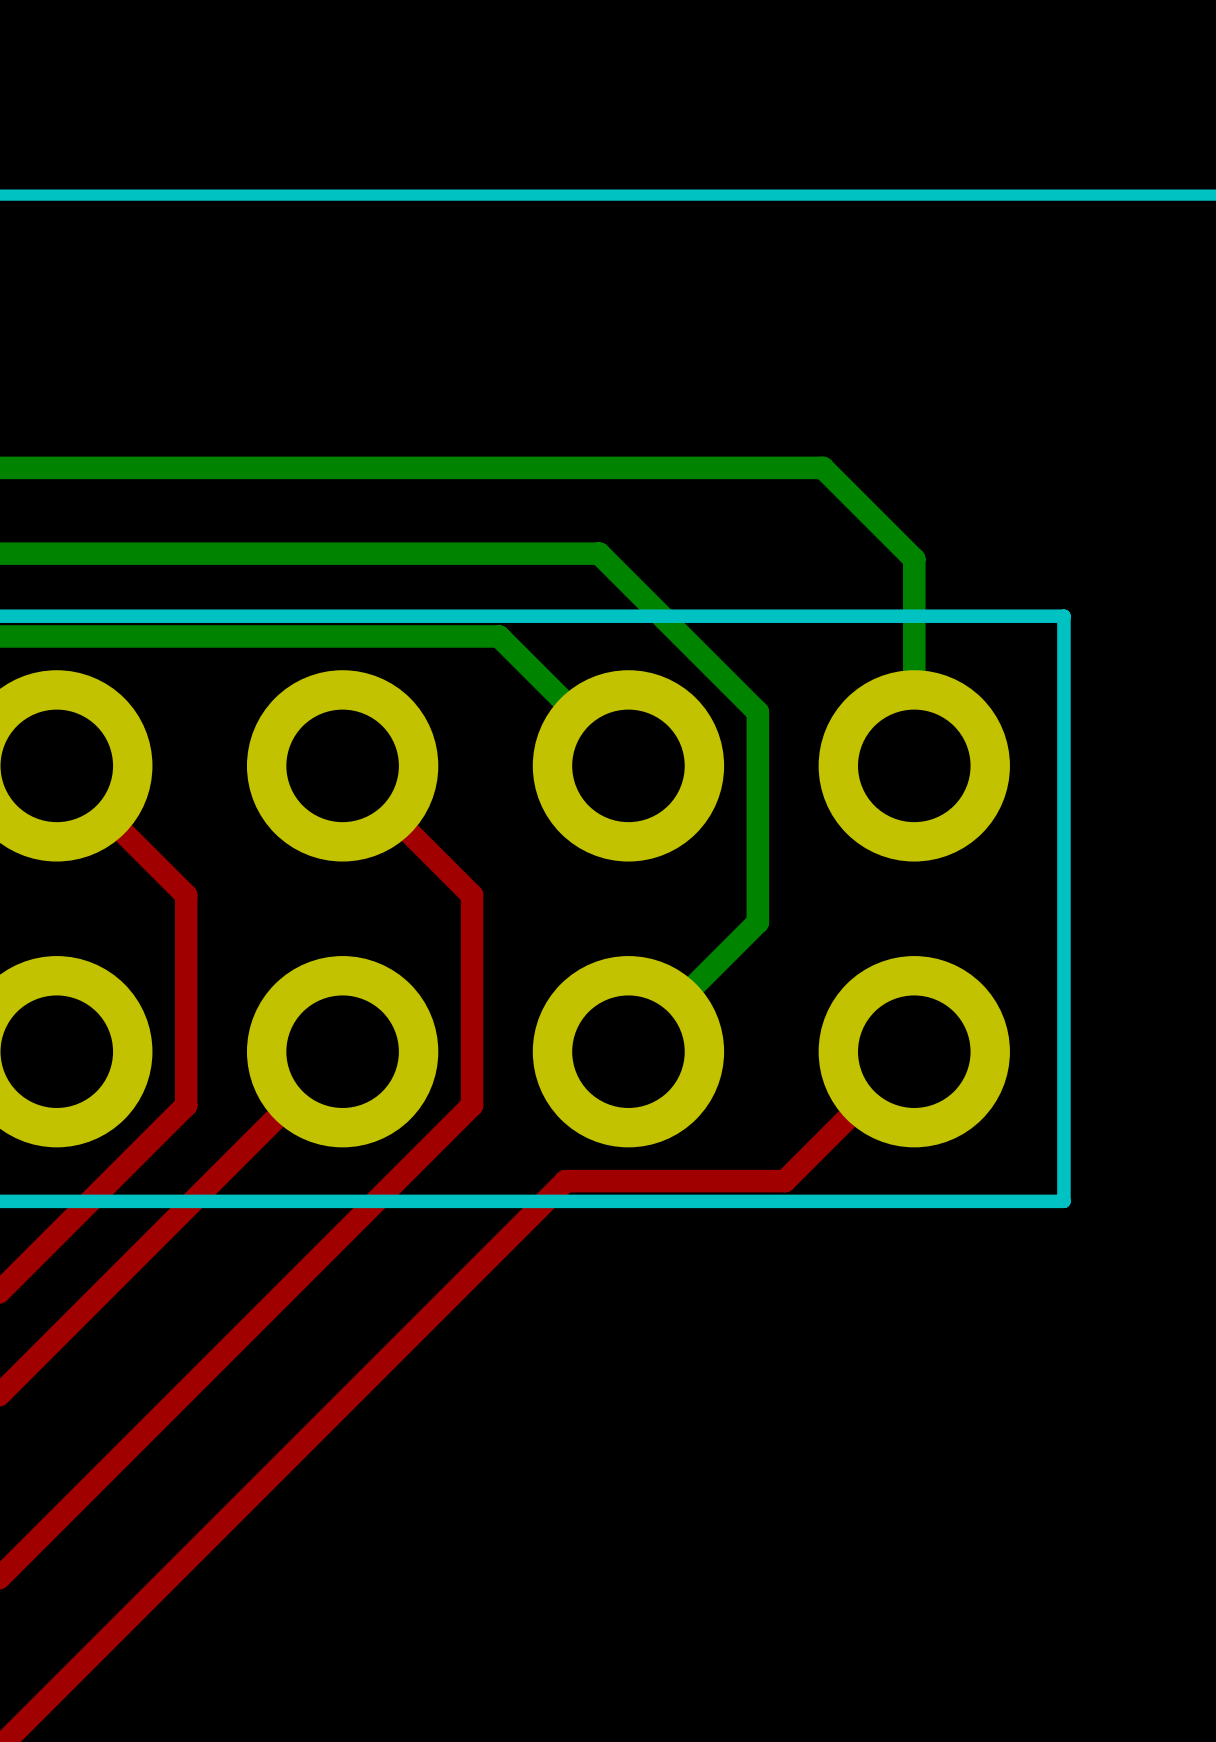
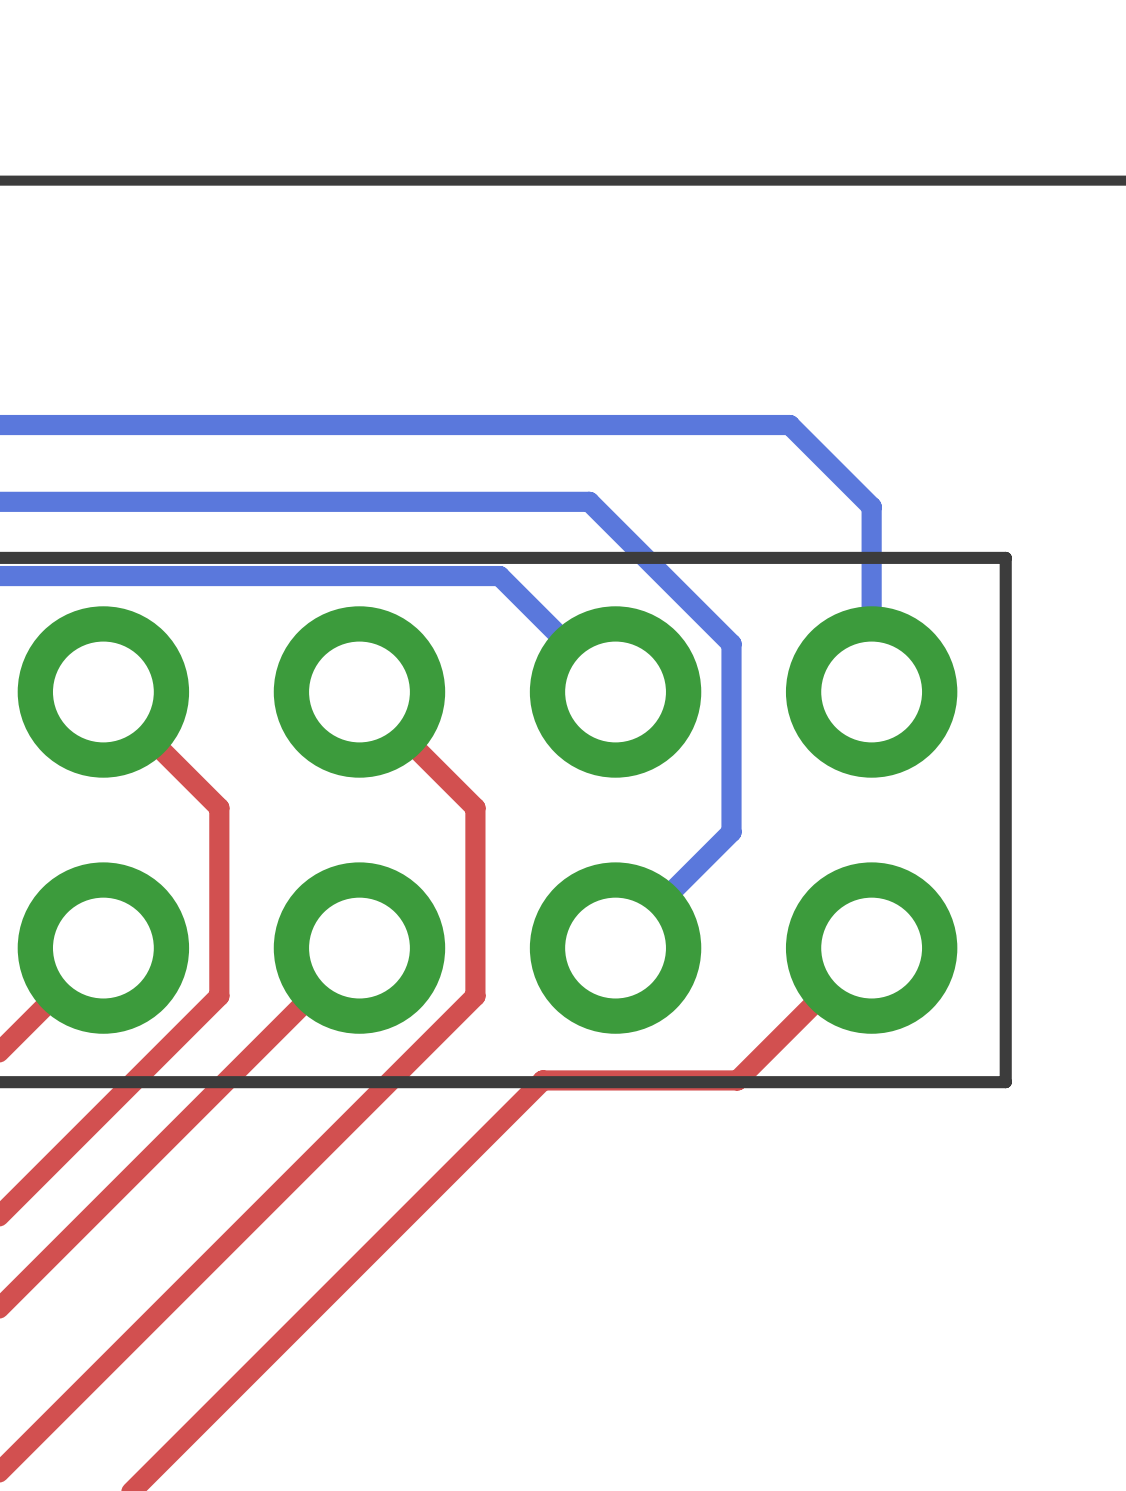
top track: (914, 1051) (784, 1181) (565, 1181) (547, 1199) -> (868, 949) (737, 1080) (542, 1080)

